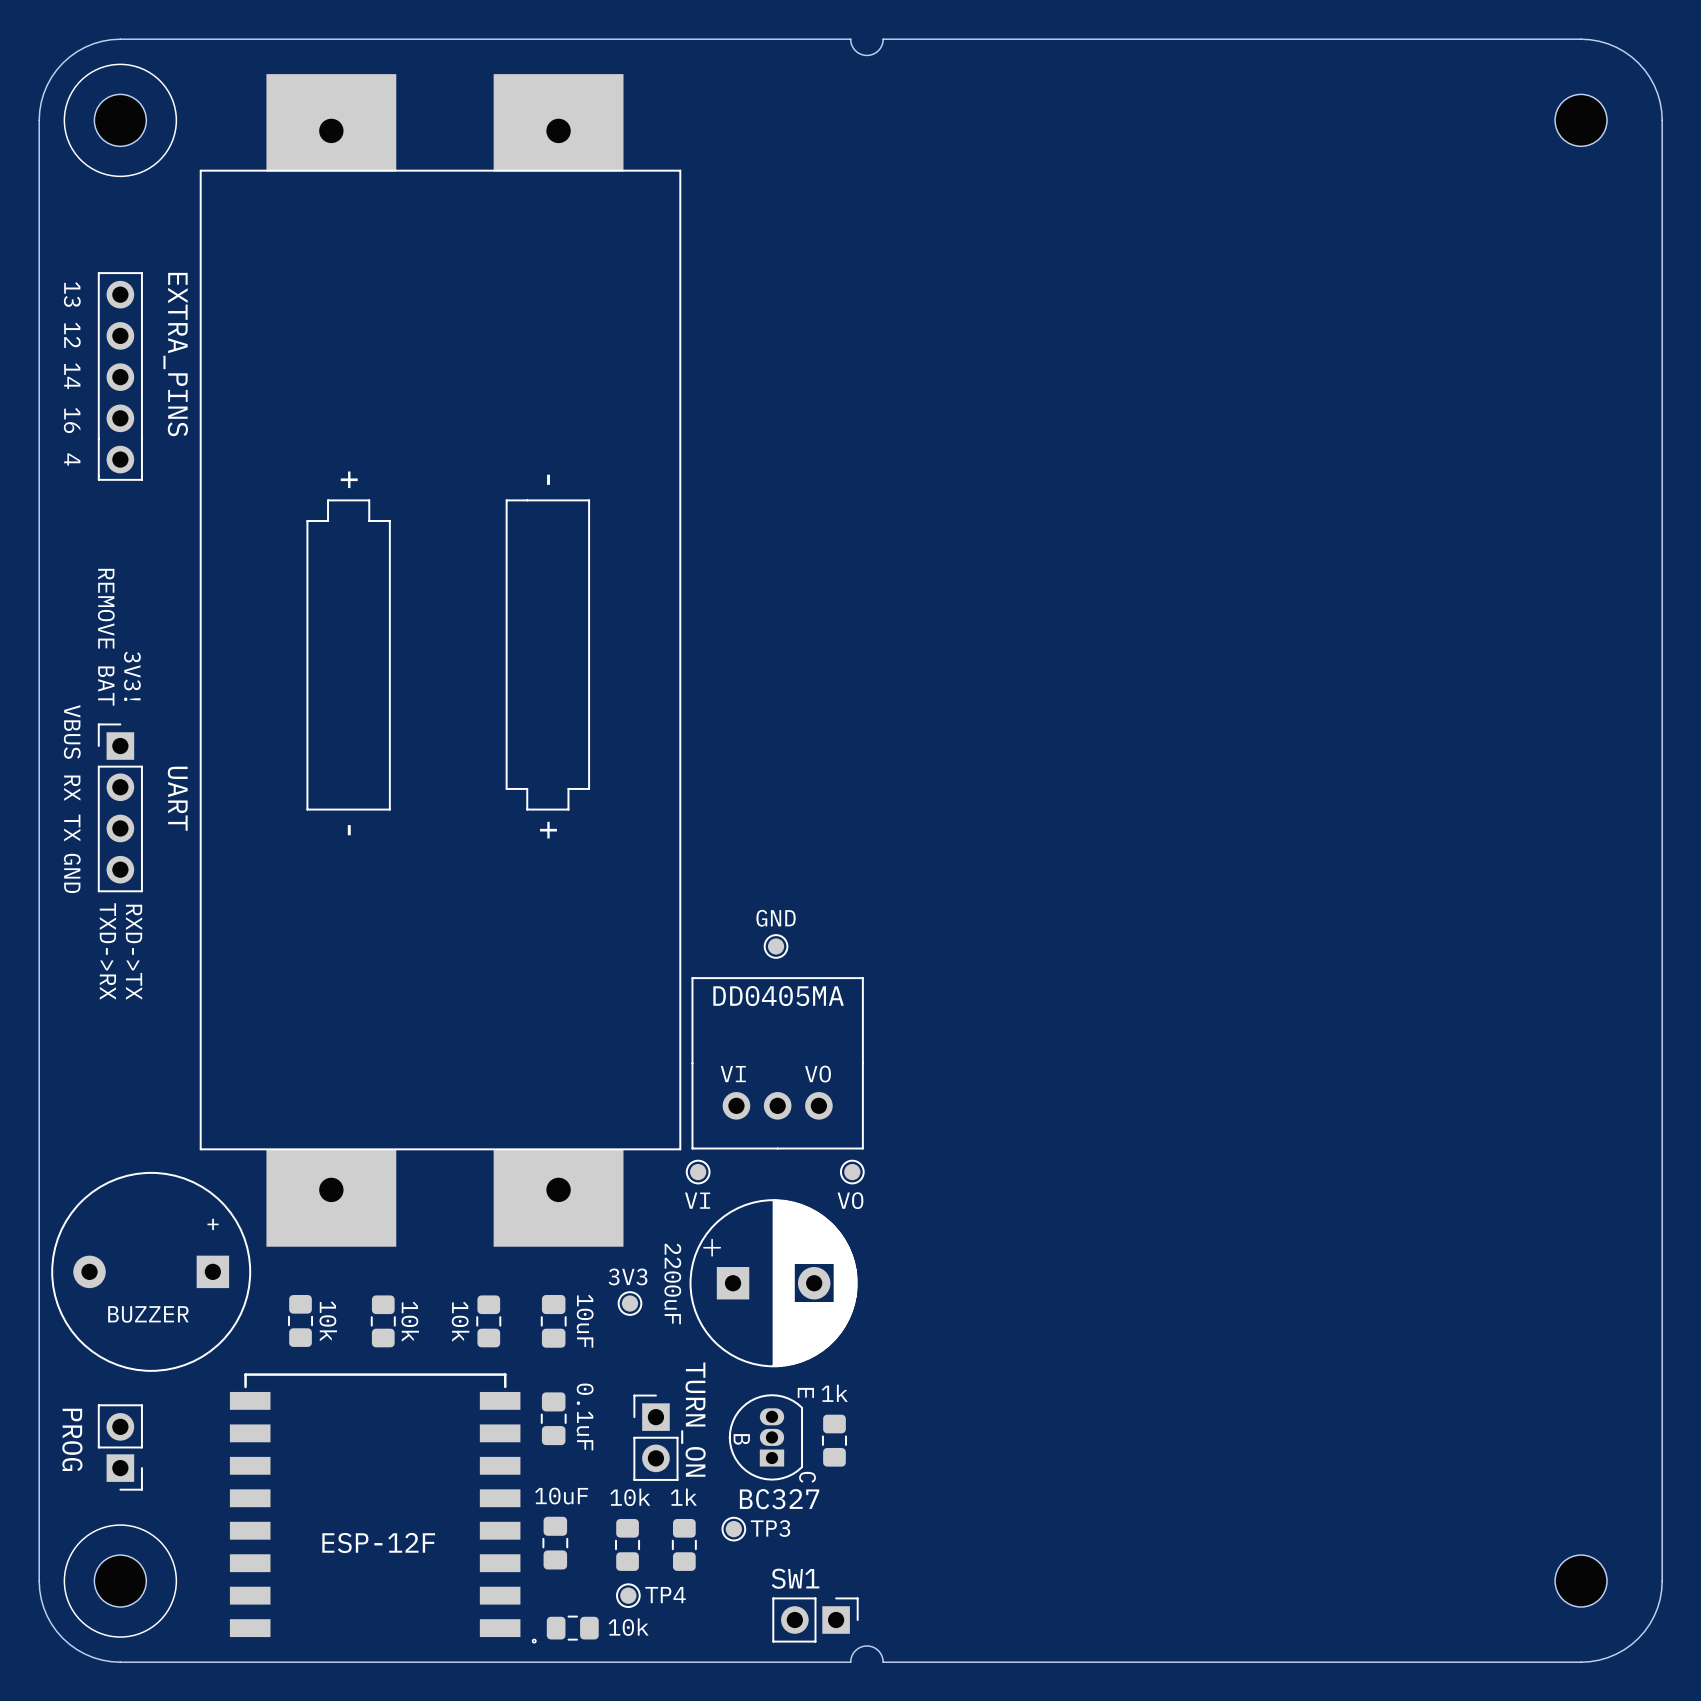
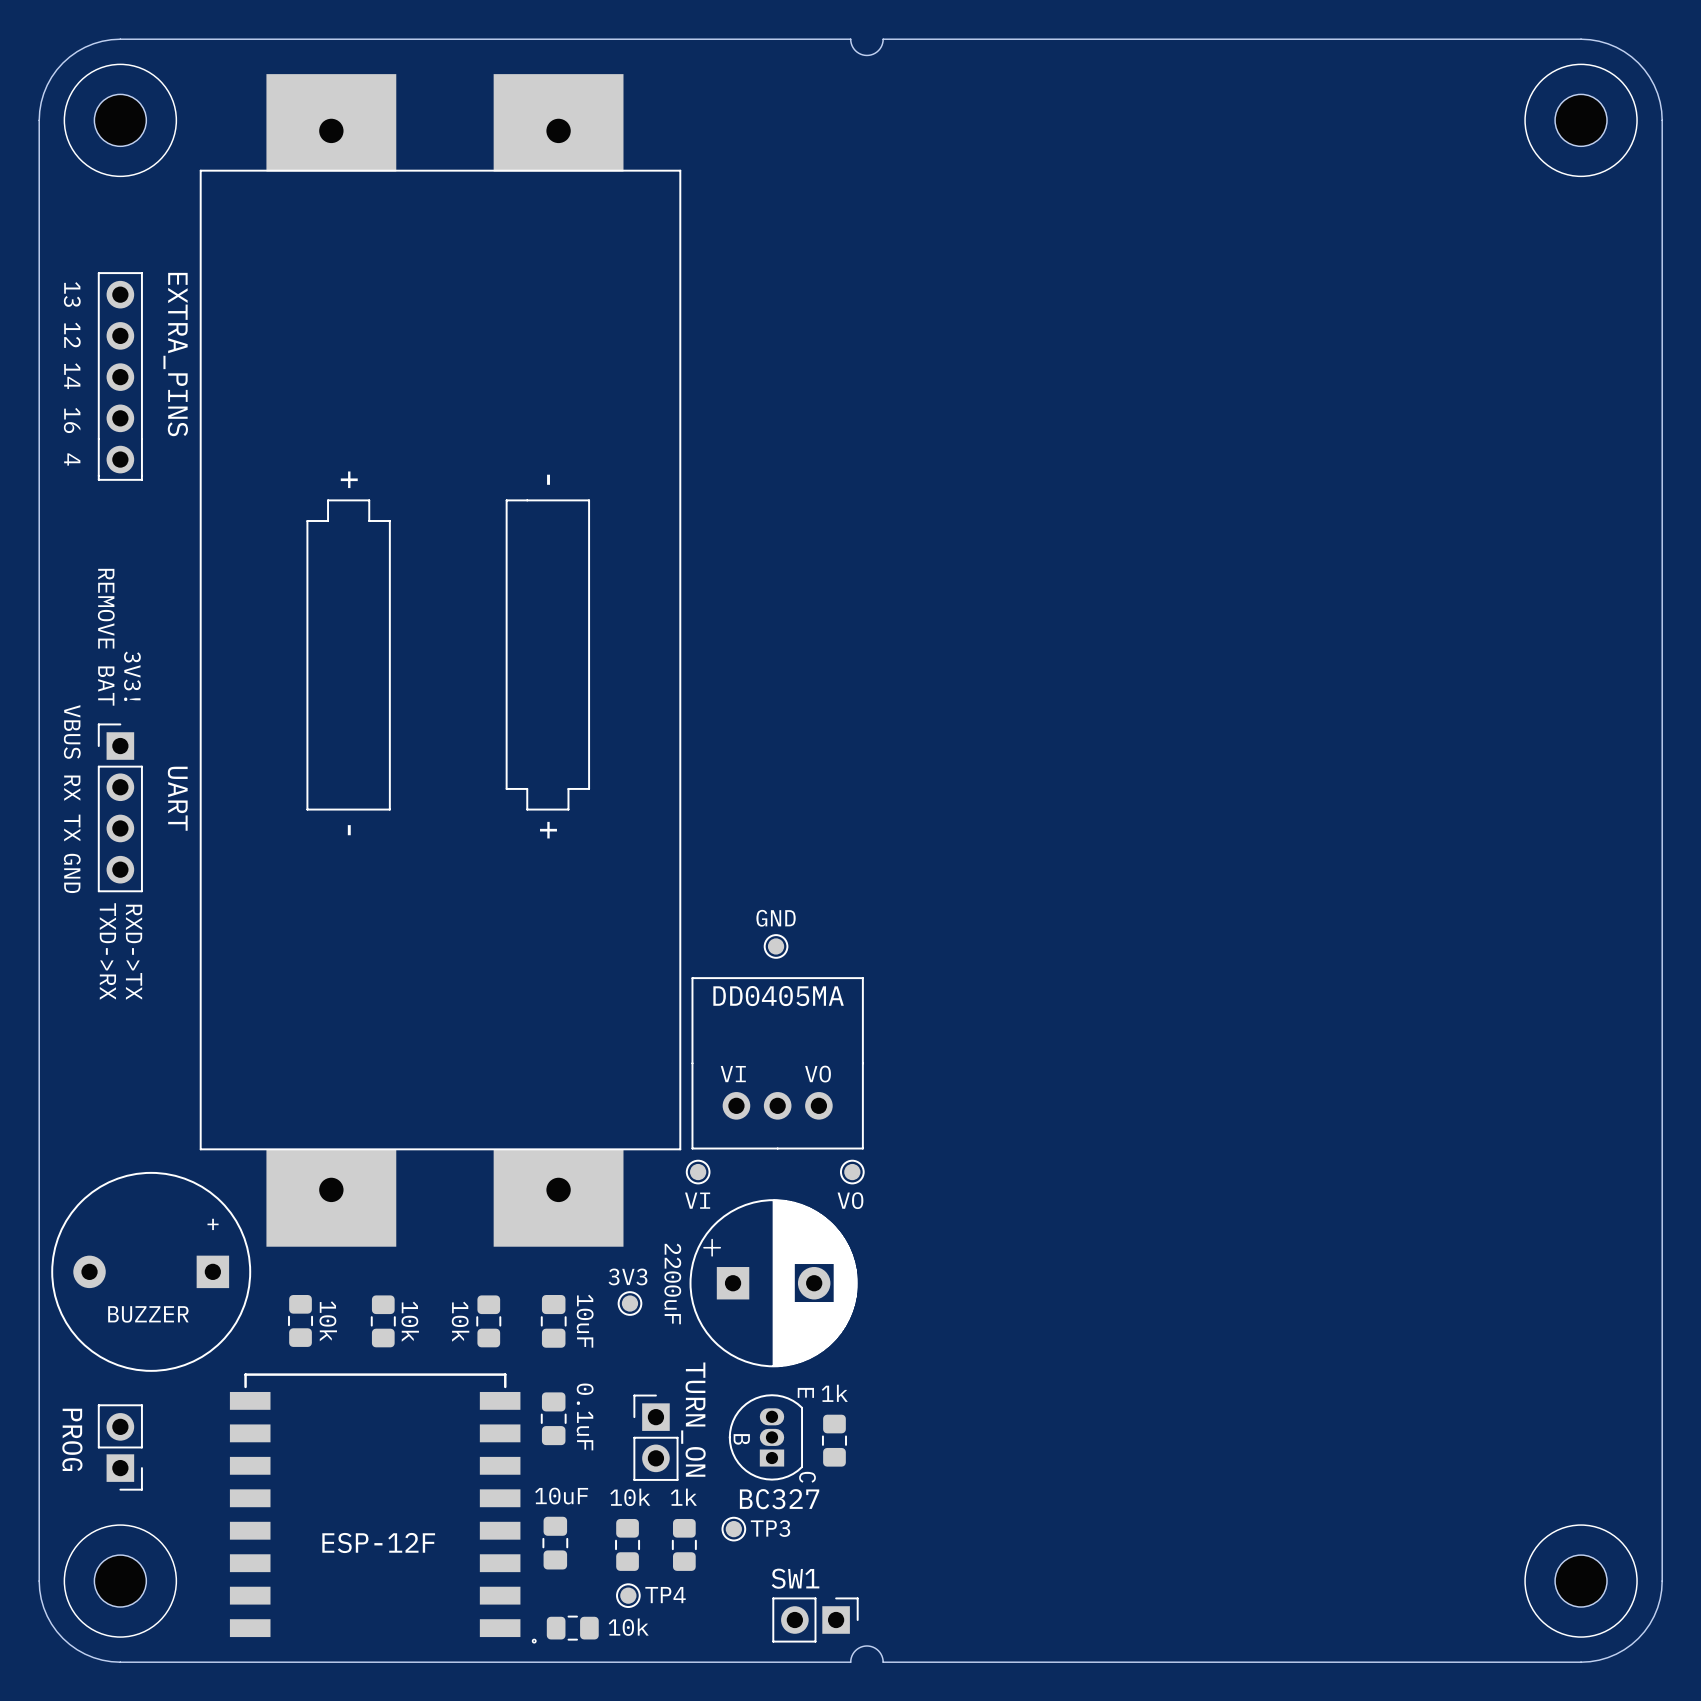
part footprint: [1555, 94, 1608, 147] -> [1524, 63, 1638, 177]
part footprint: [1555, 1555, 1608, 1608] -> [1524, 1524, 1638, 1638]

